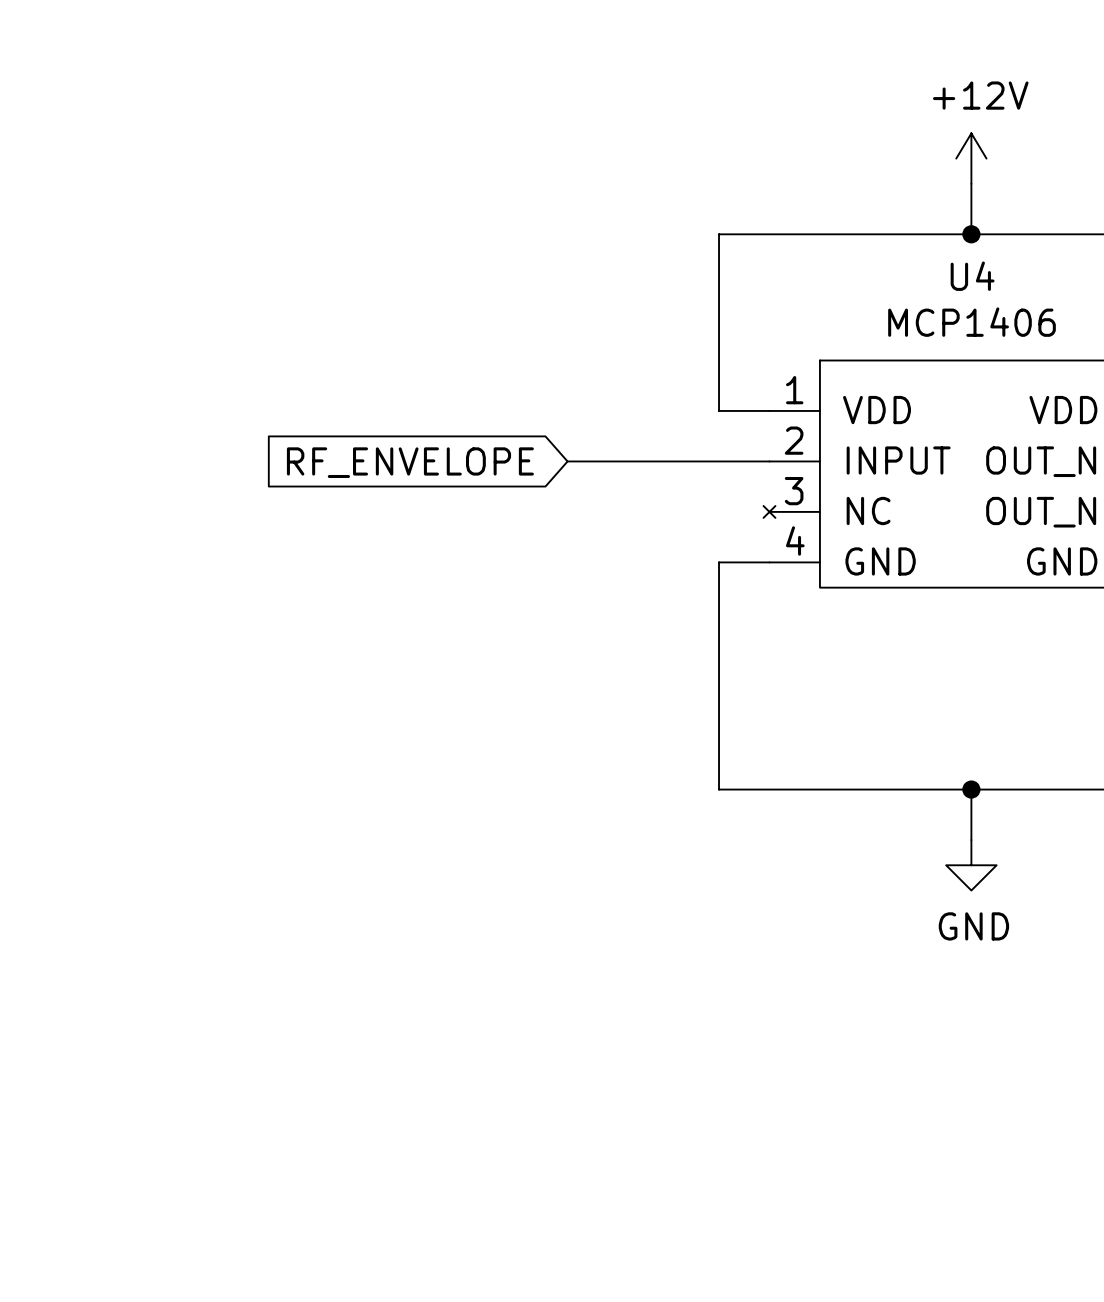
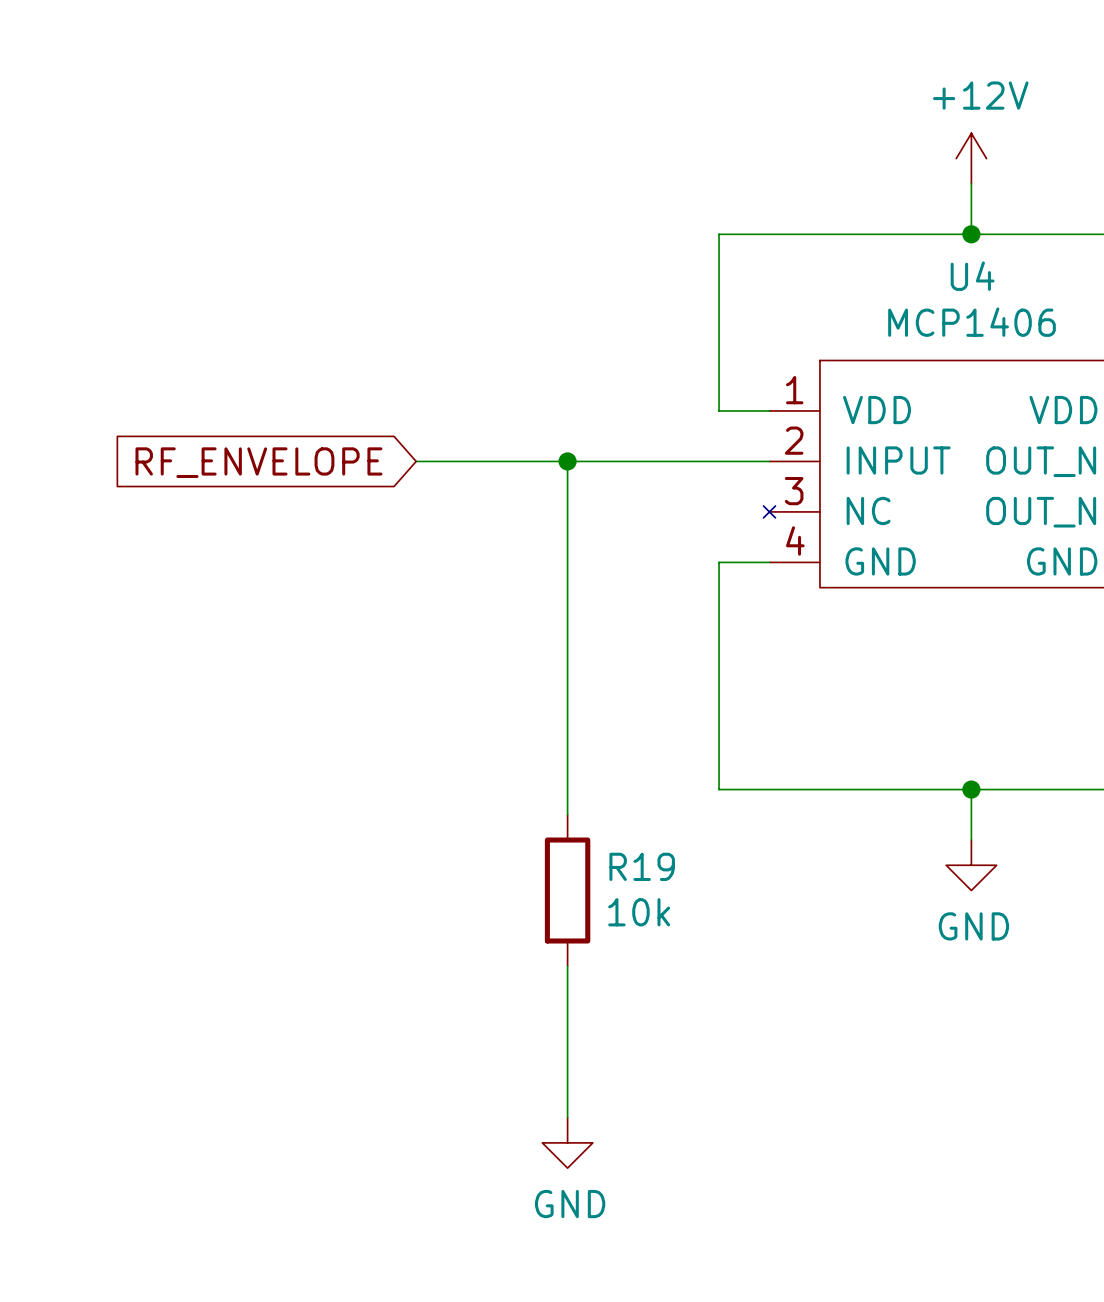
wire: none -> (416, 461) (567, 461) (567, 814)
junction: none -> (567, 461)
global label position: RF_ENVELOPE (410, 462) -> RF_ENVELOPE (258, 462)
R19: none -> 10k (567, 890)
wire: none -> (567, 966) (567, 1117)
power symbol: none -> GND (567, 1142)

